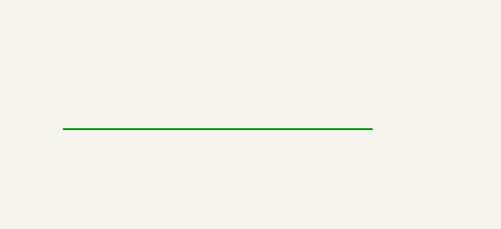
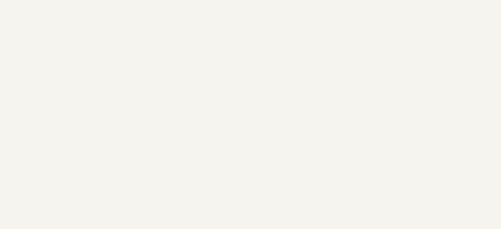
wire: (63, 129) (372, 129) -> none

